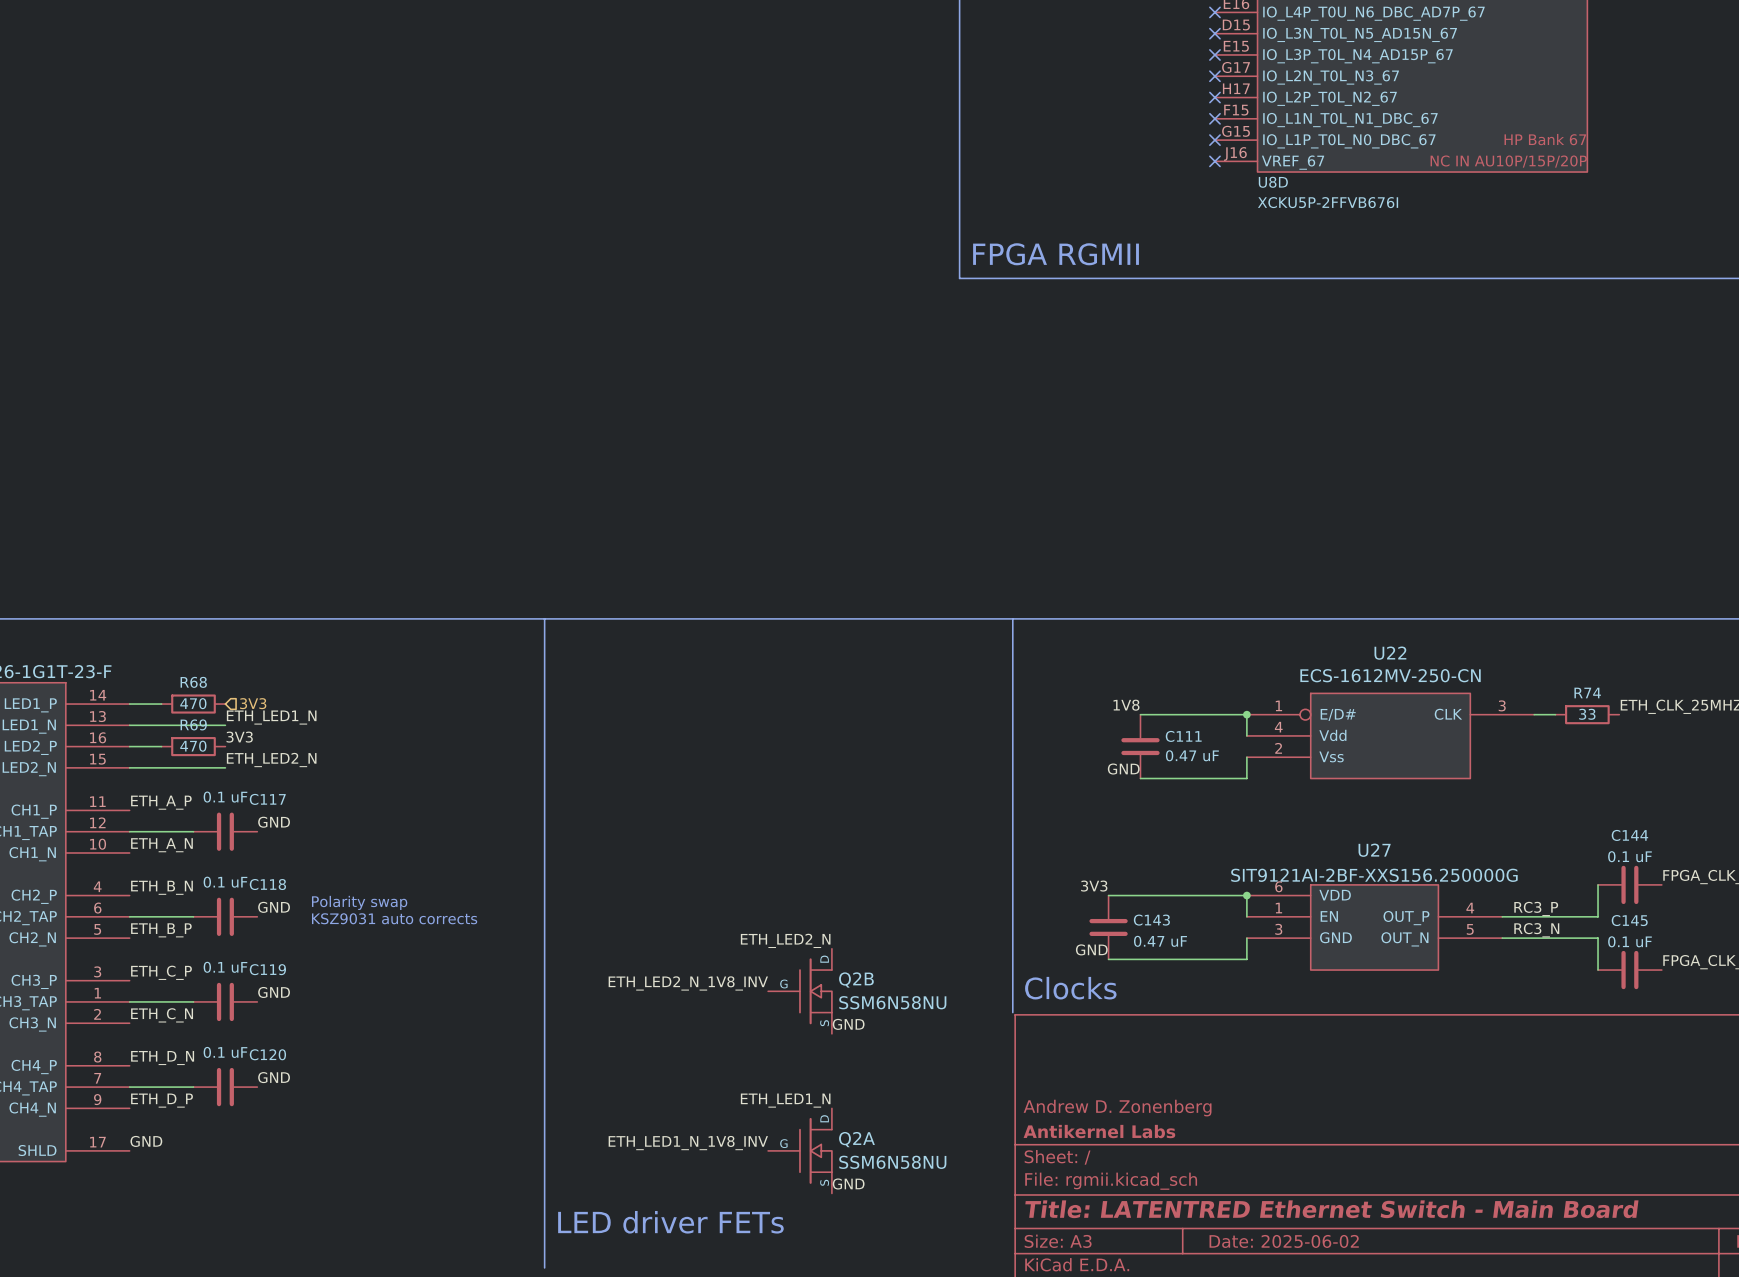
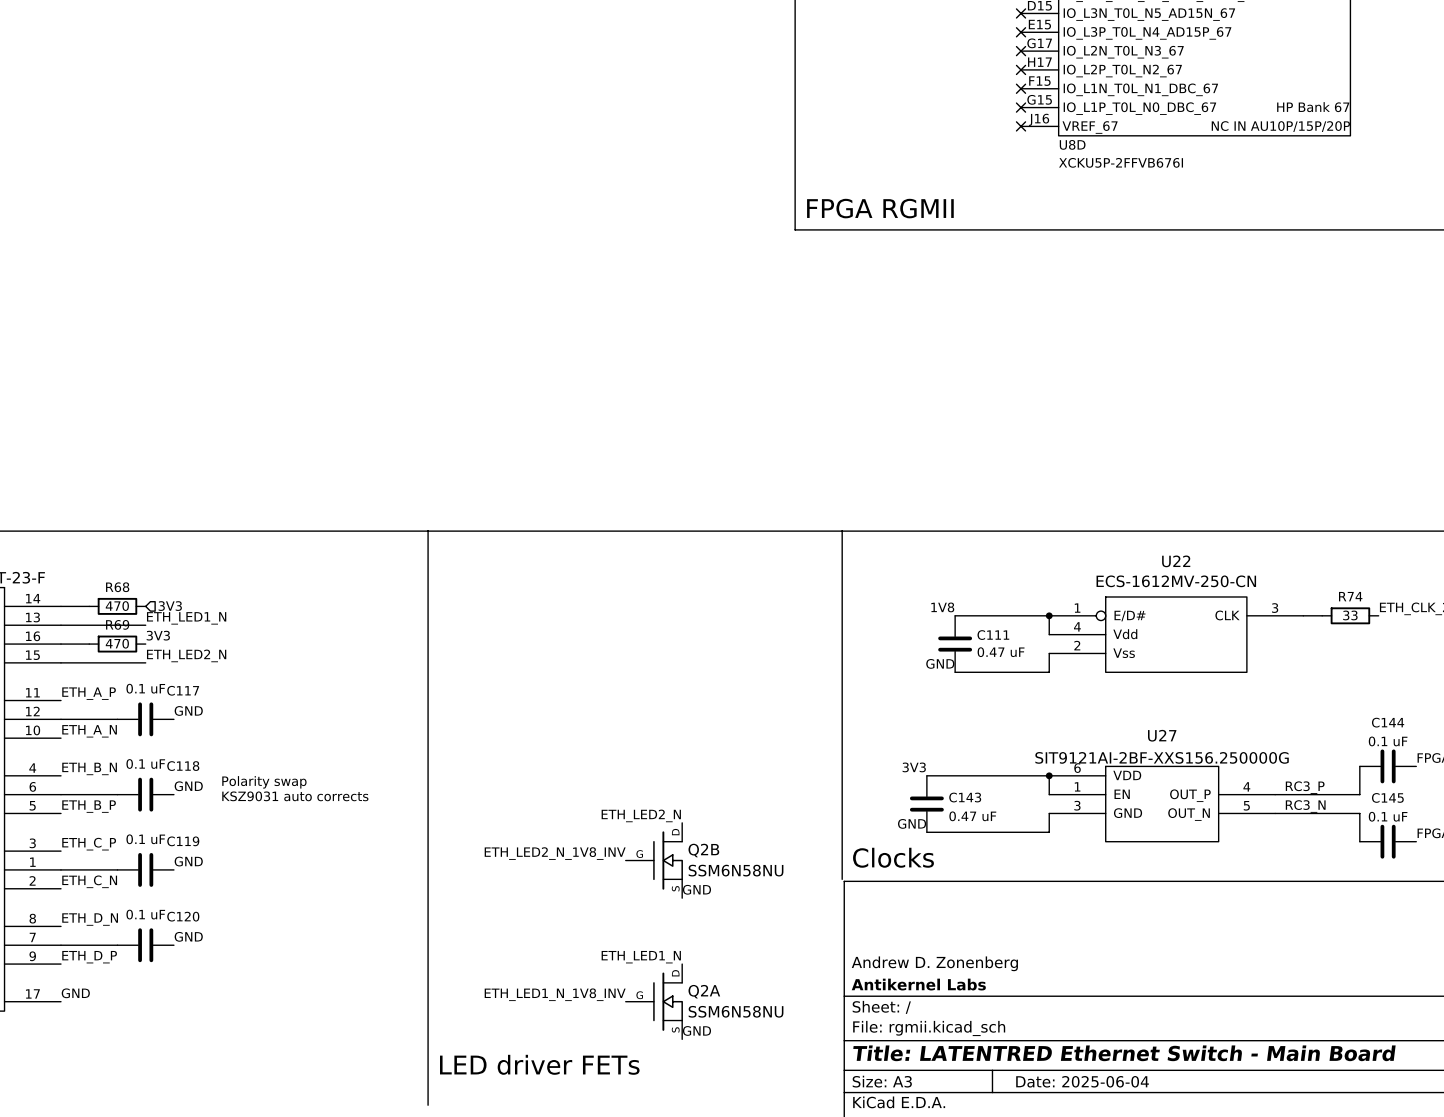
title block: Date: 2025-06-02 (1284, 1241) -> Date: 2025-06-04 (1082, 1081)

